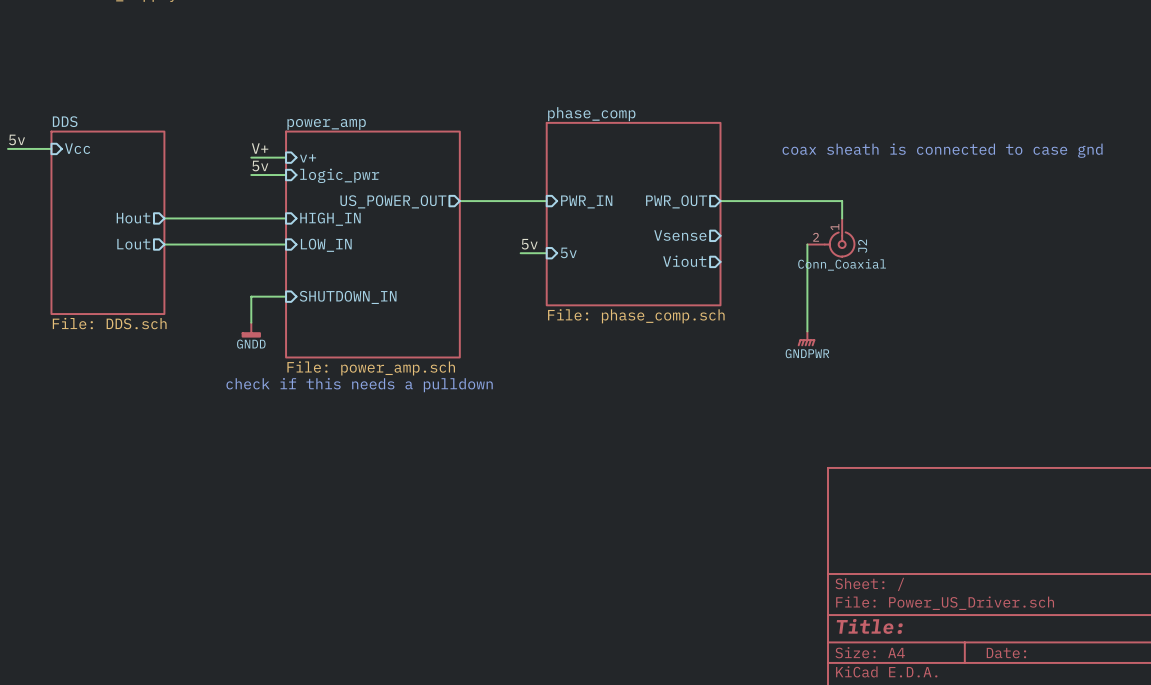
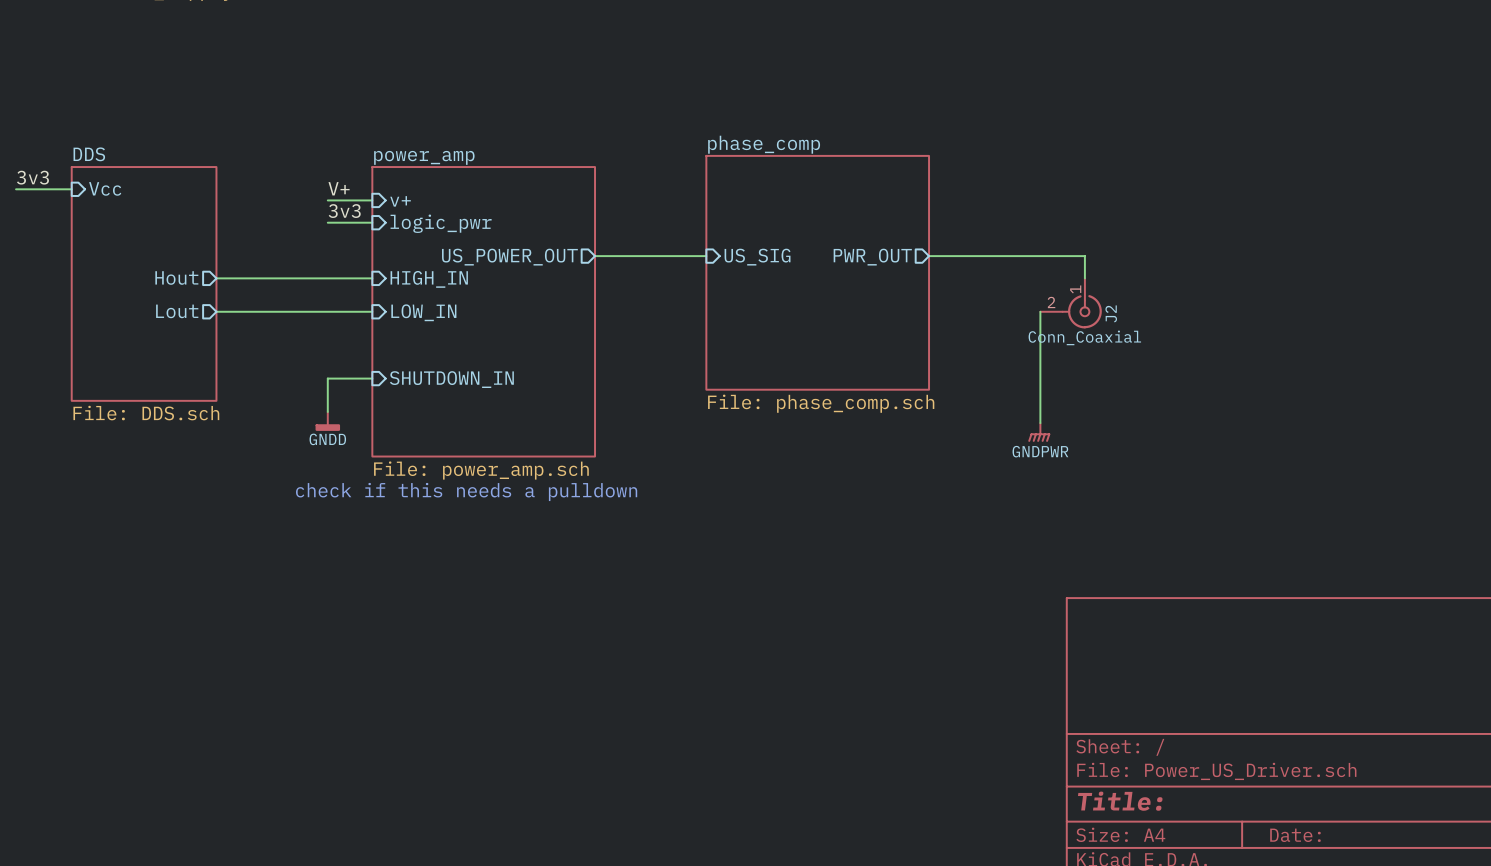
label: 5v (17, 139) -> 3v3 (32, 177)
text: coax sheath is connected to case gnd (942, 150) -> none
label: 5v (260, 166) -> 3v3 (344, 211)
sheet pin: PWR_IN (586, 201) -> US_SIG (757, 257)
sheet pin: Vsense (680, 235) -> none
label: 5v (529, 244) -> none
sheet pin: 5v (568, 252) -> none
wire: (520, 253) (546, 253) -> none
sheet pin: Viout (684, 261) -> none

